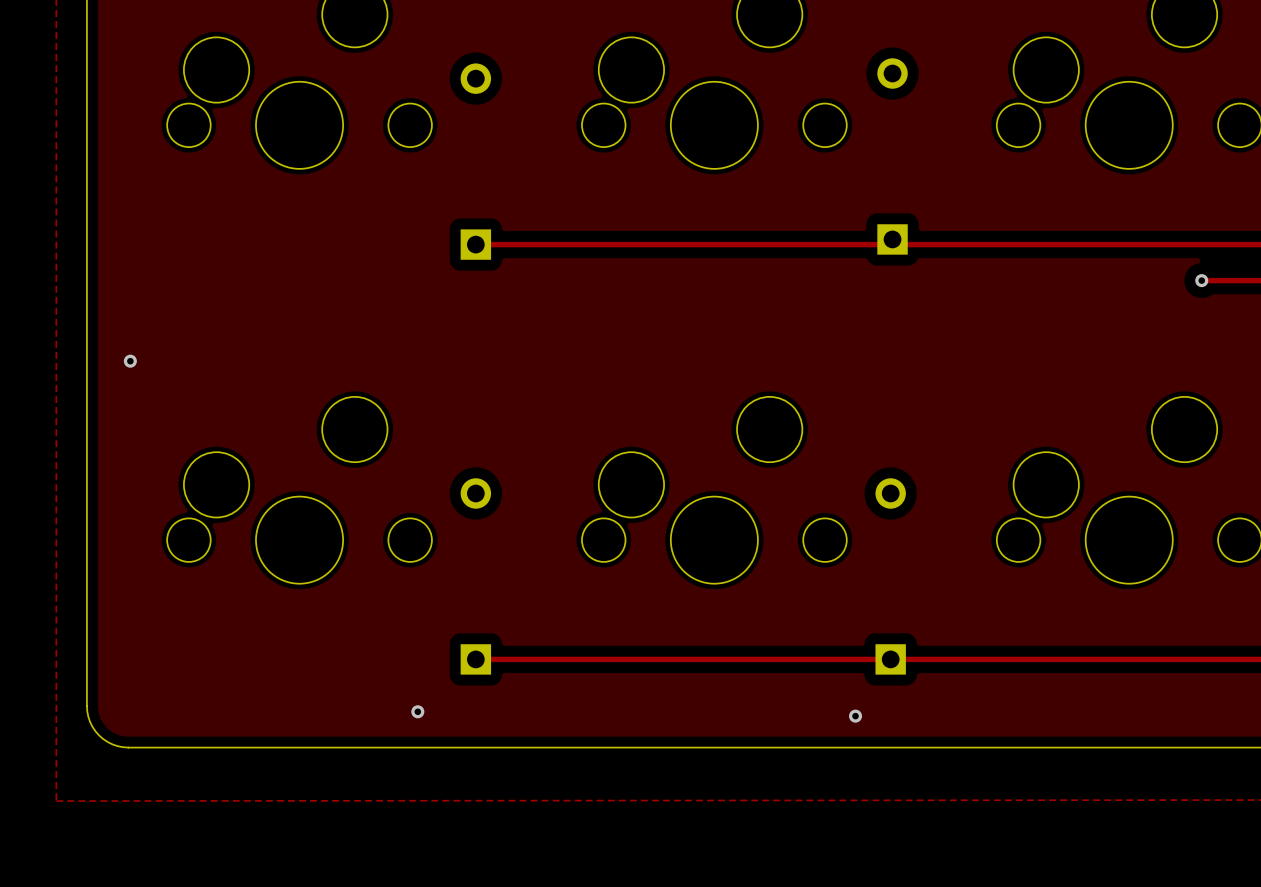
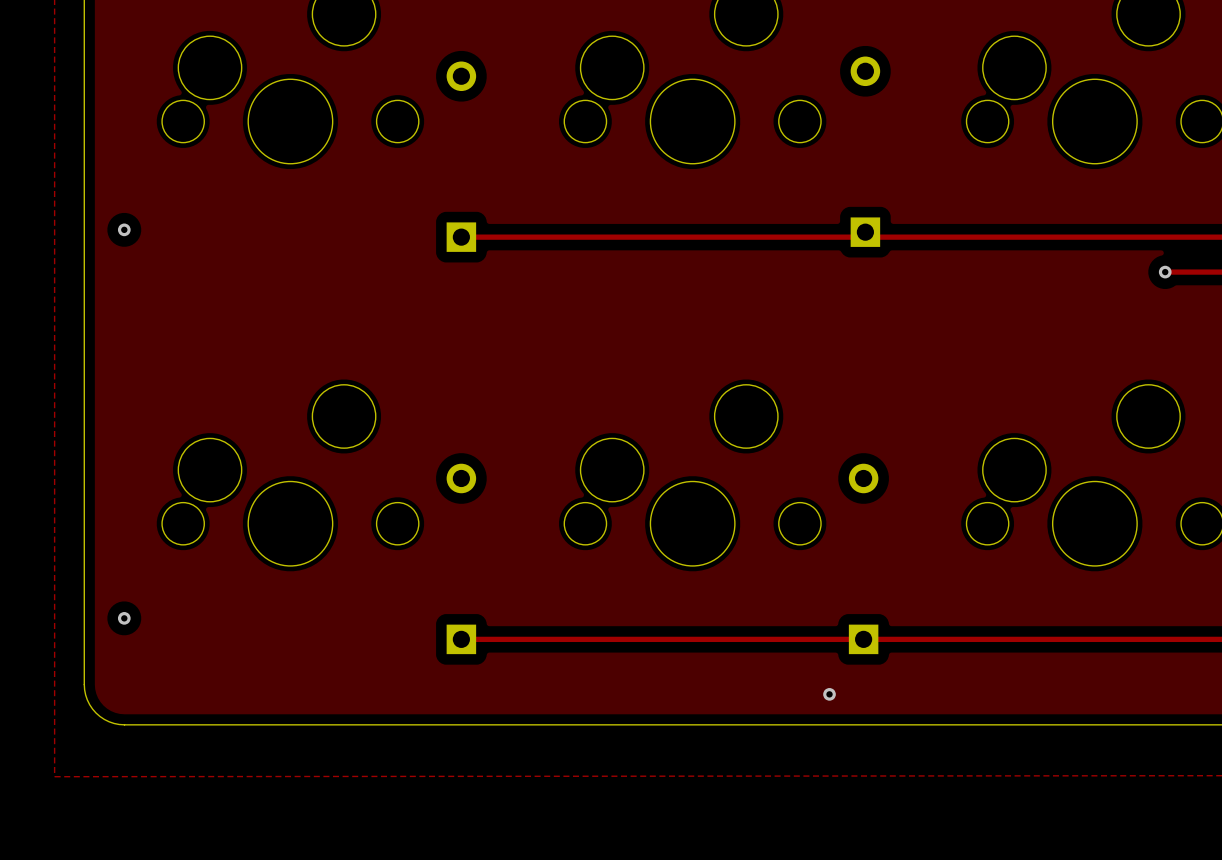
via position: (130, 361) -> (124, 229)
via: none -> (124, 618)
via: (417, 711) -> none

